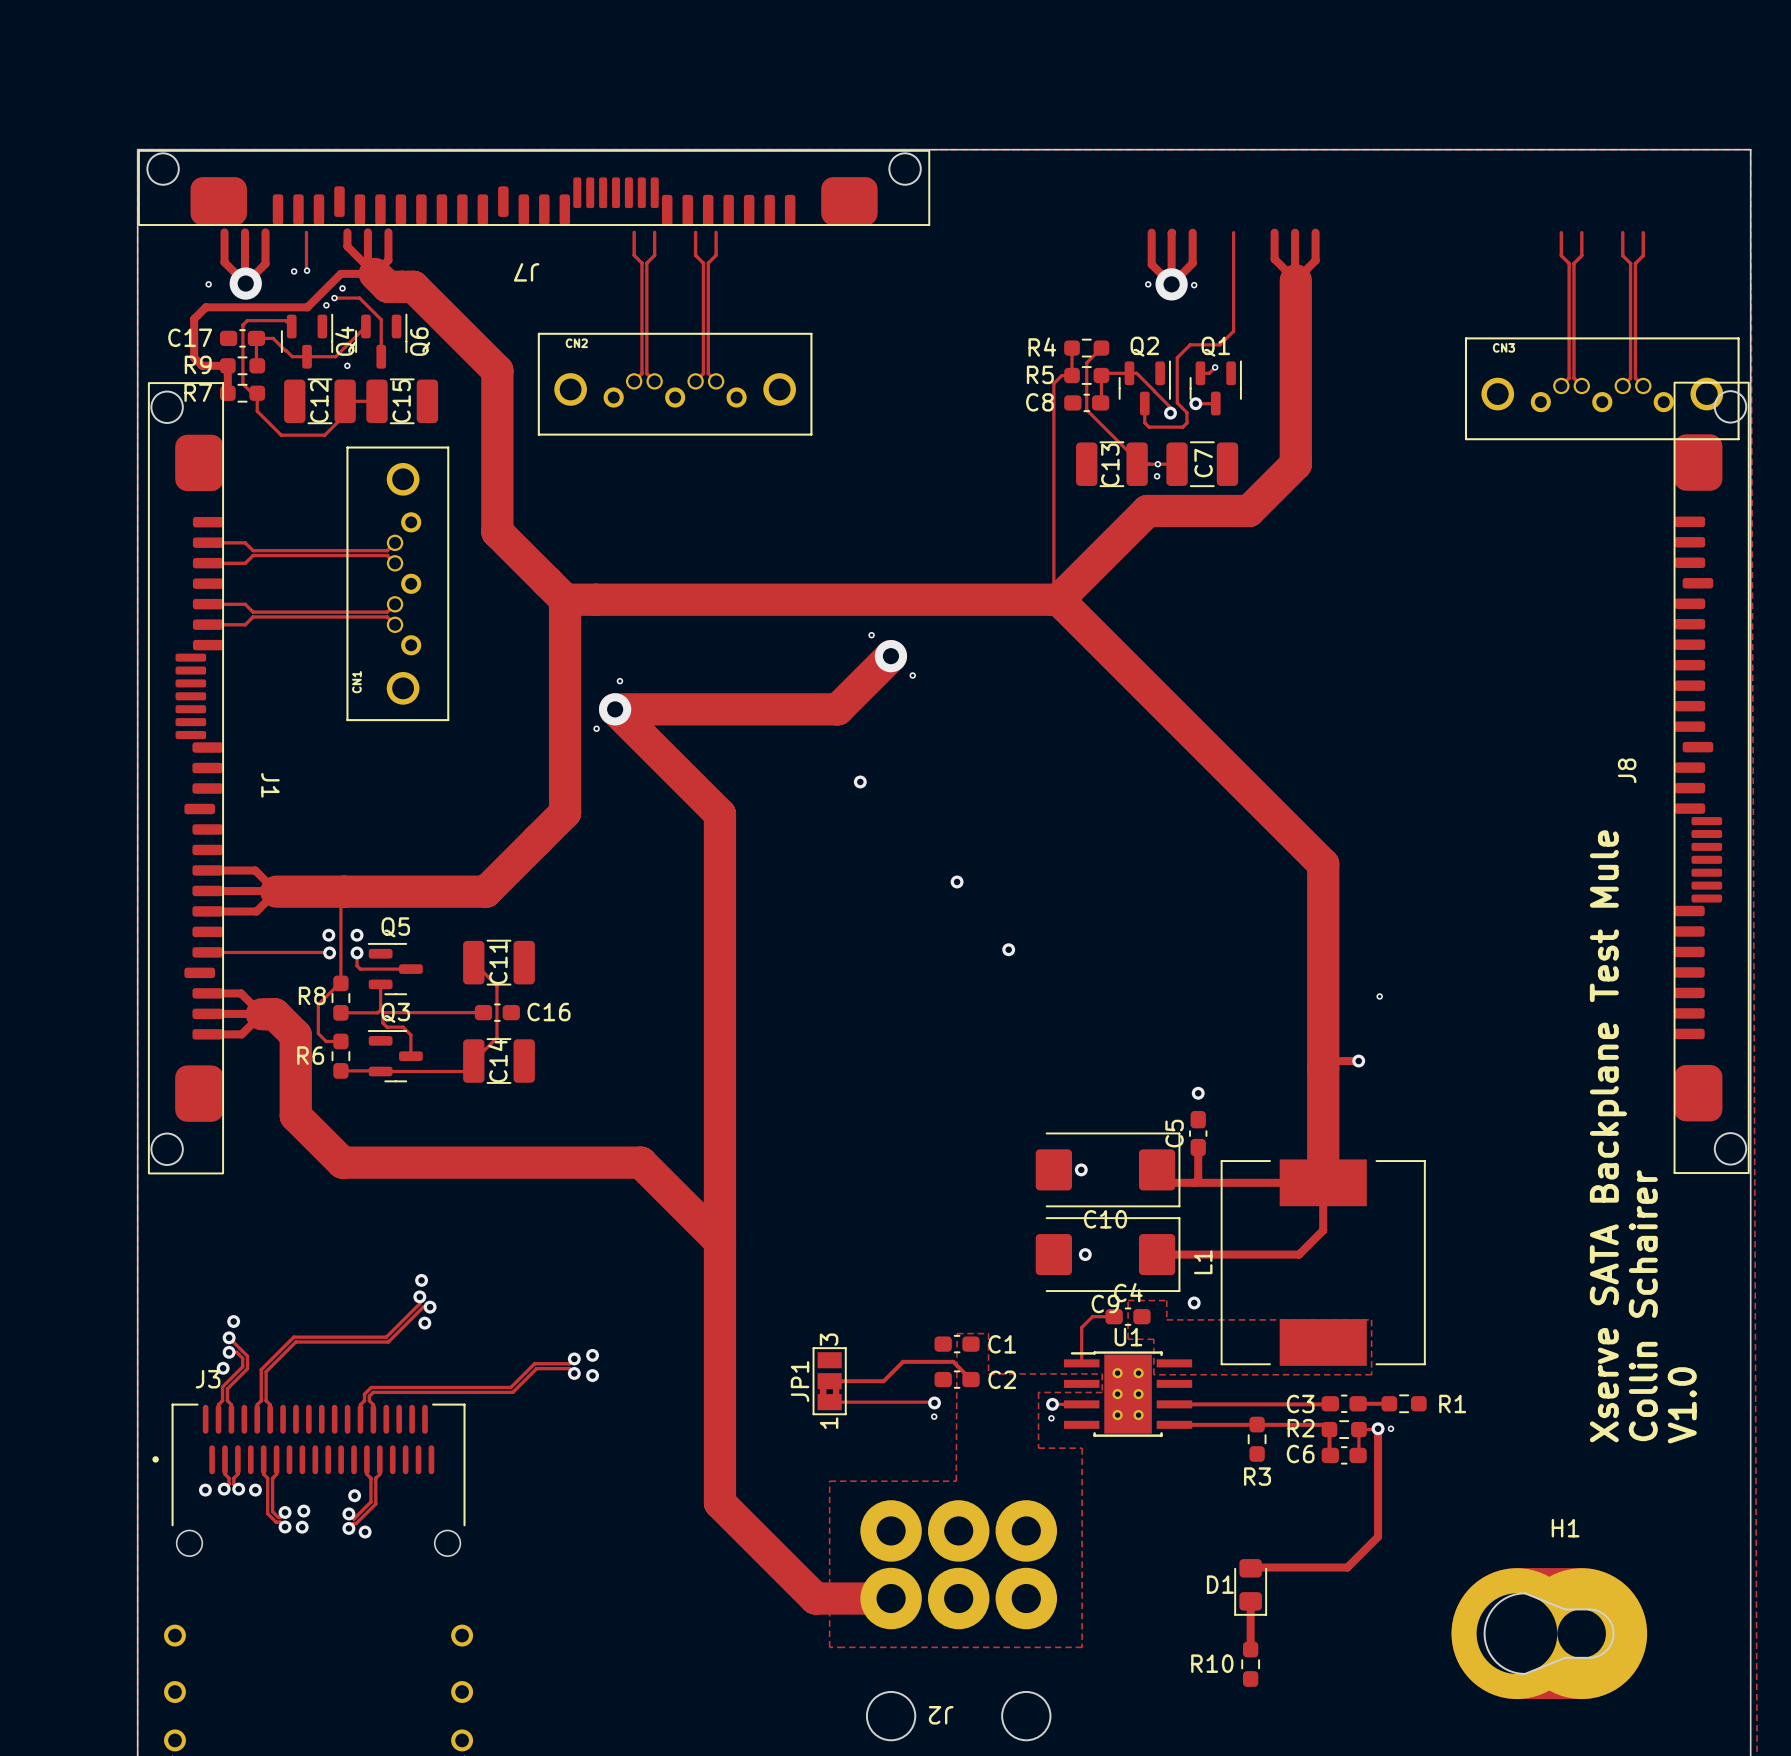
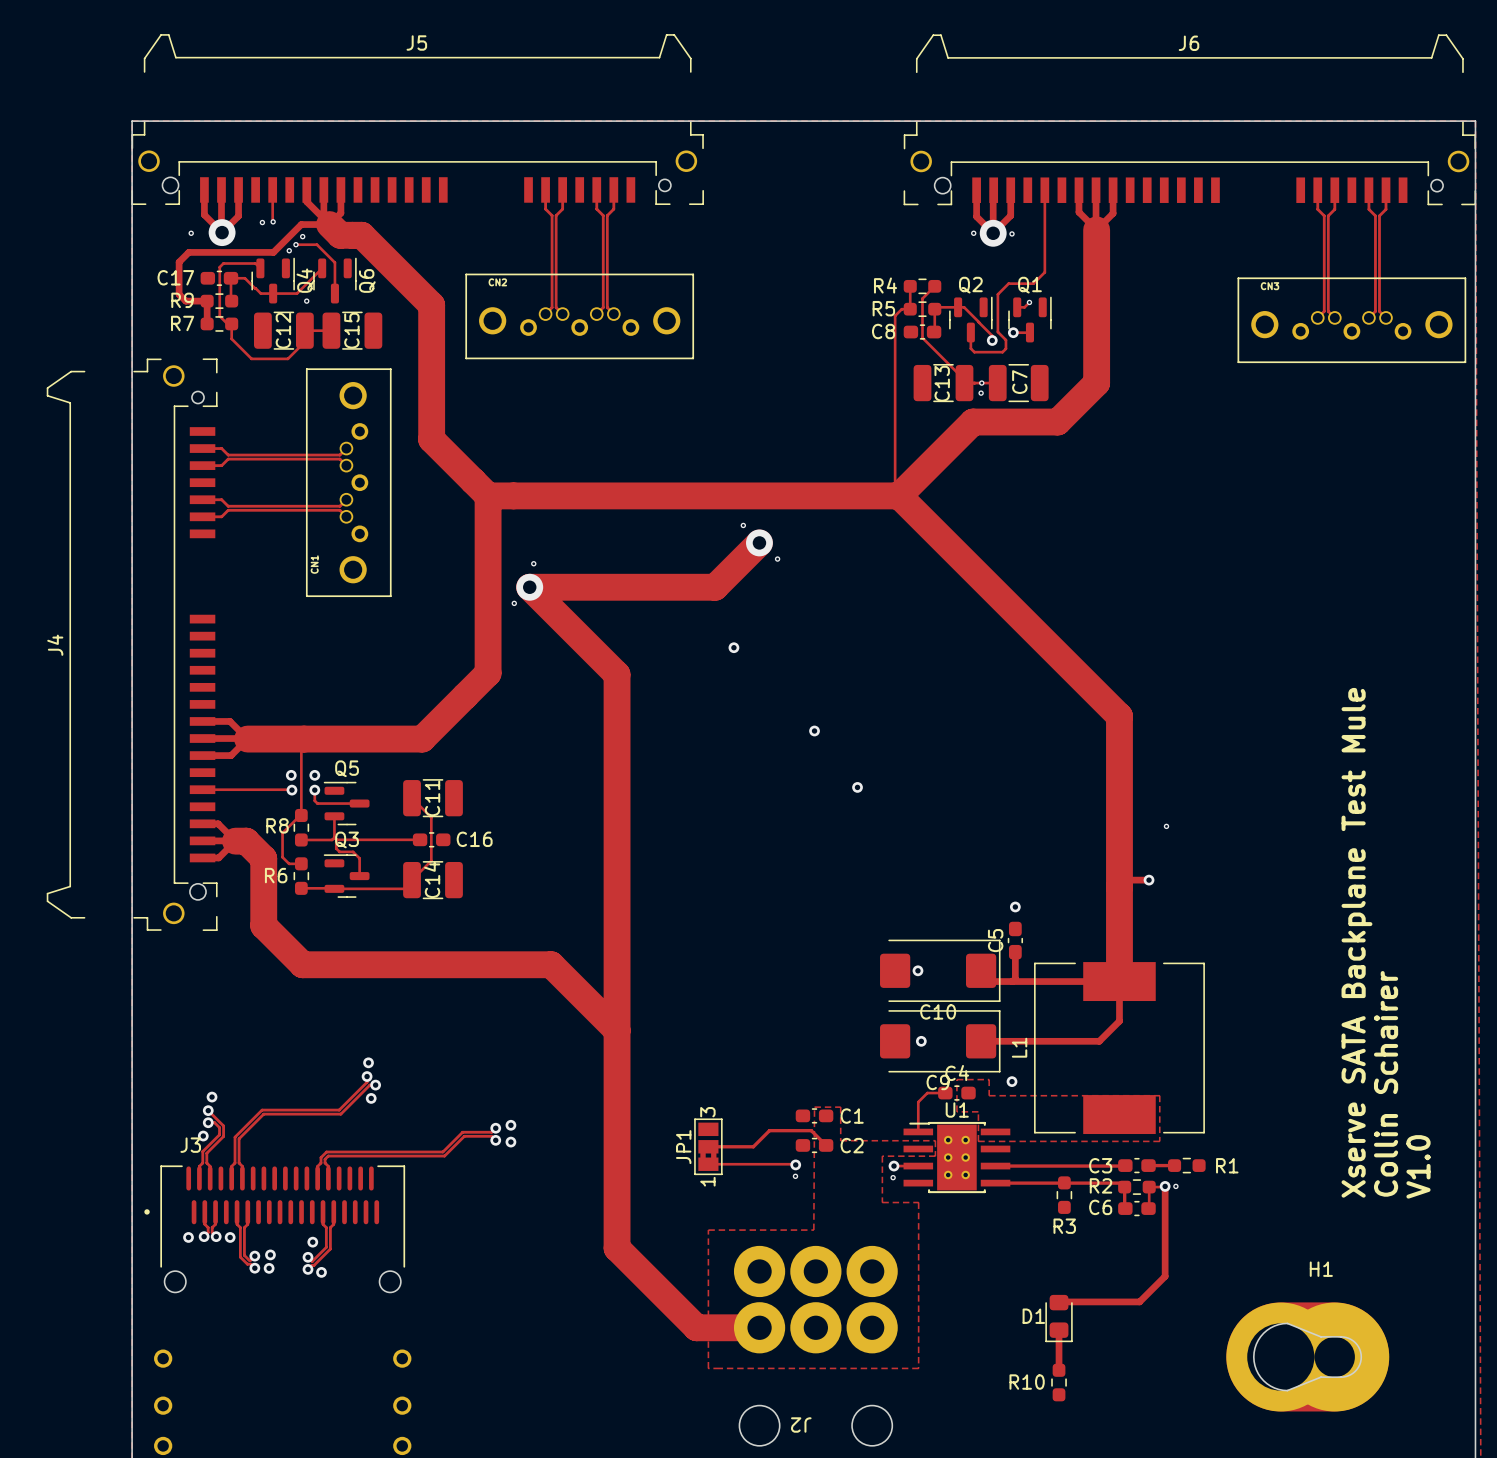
J5: none -> (417, 119)
J6: none -> (1189, 119)
J7: (534, 187) -> none
J8: (1711, 777) -> none
J4: none -> (132, 644)
J1: (185, 778) -> none

